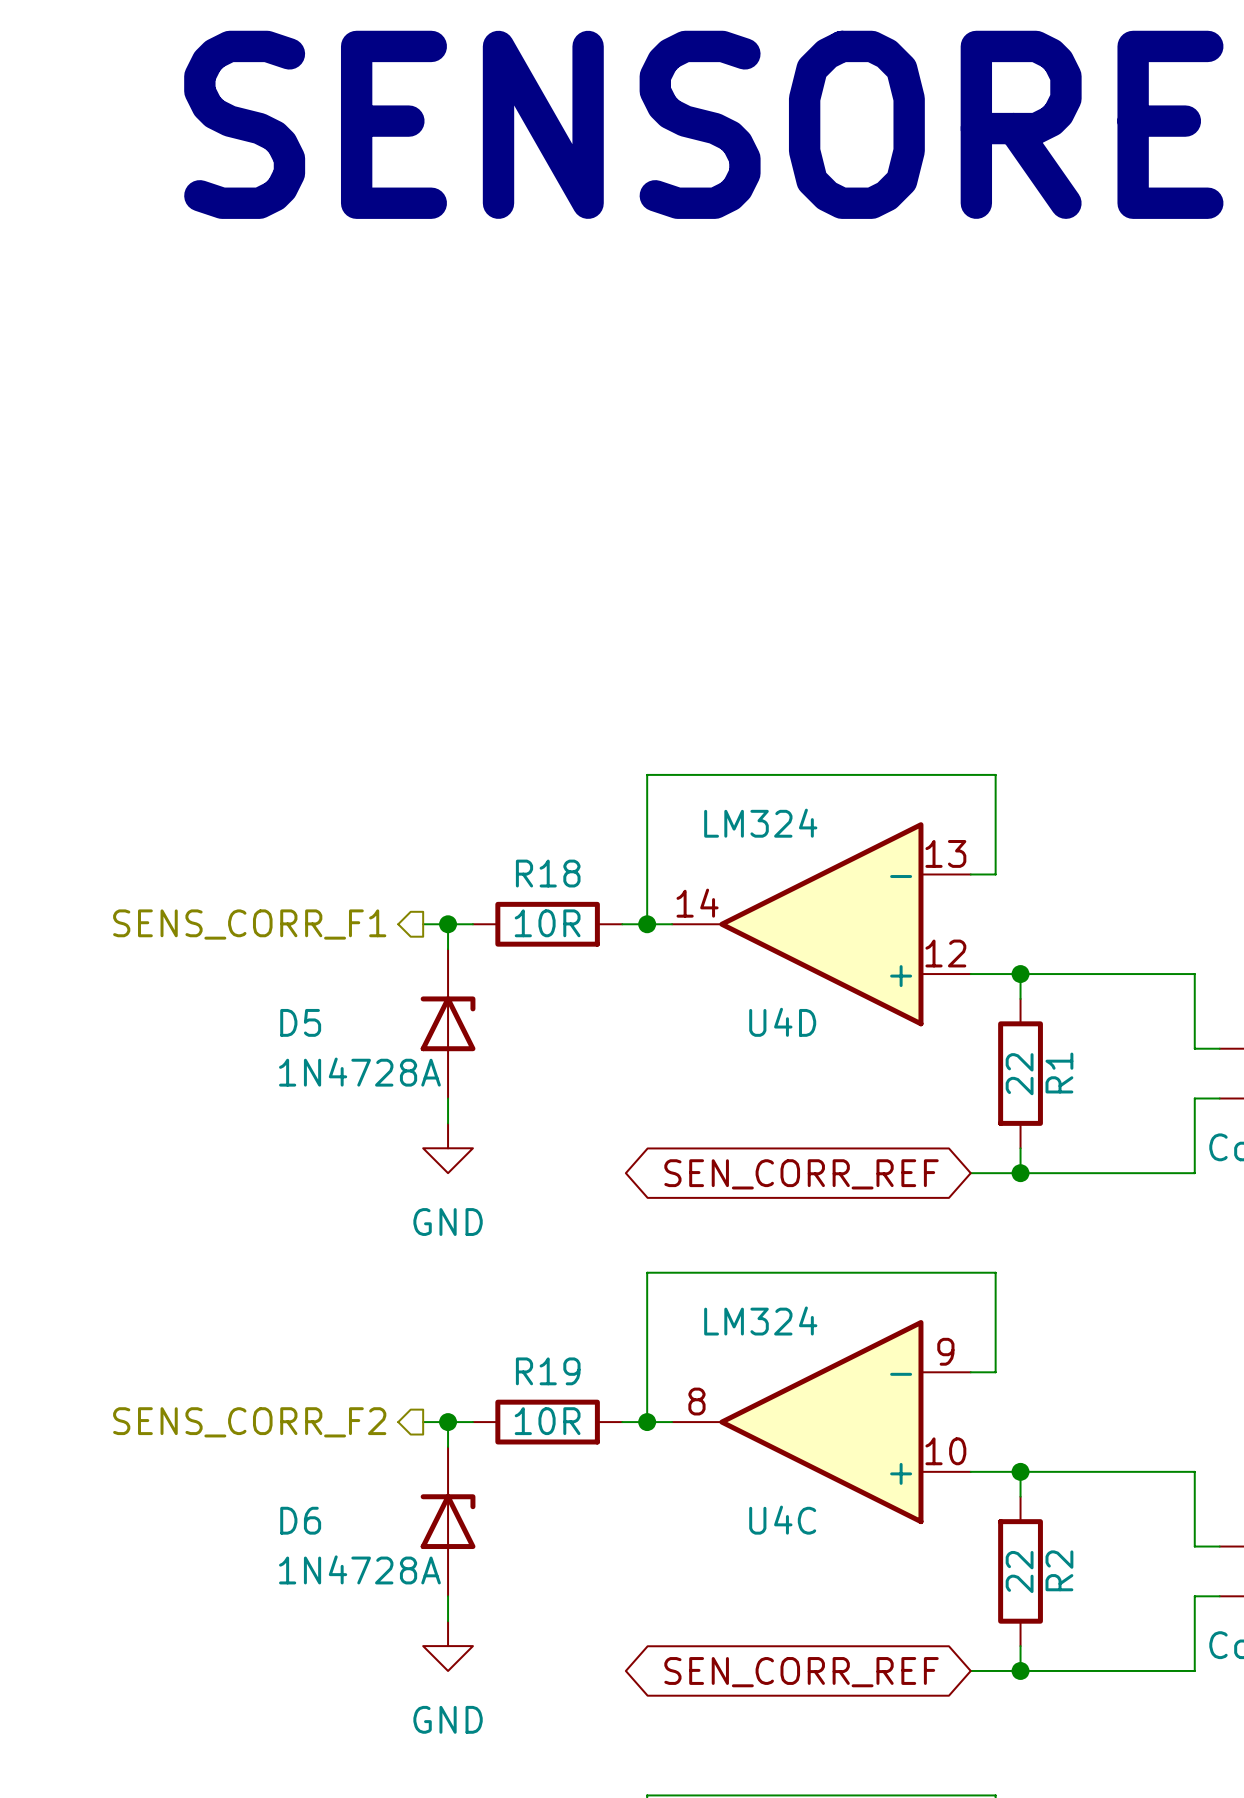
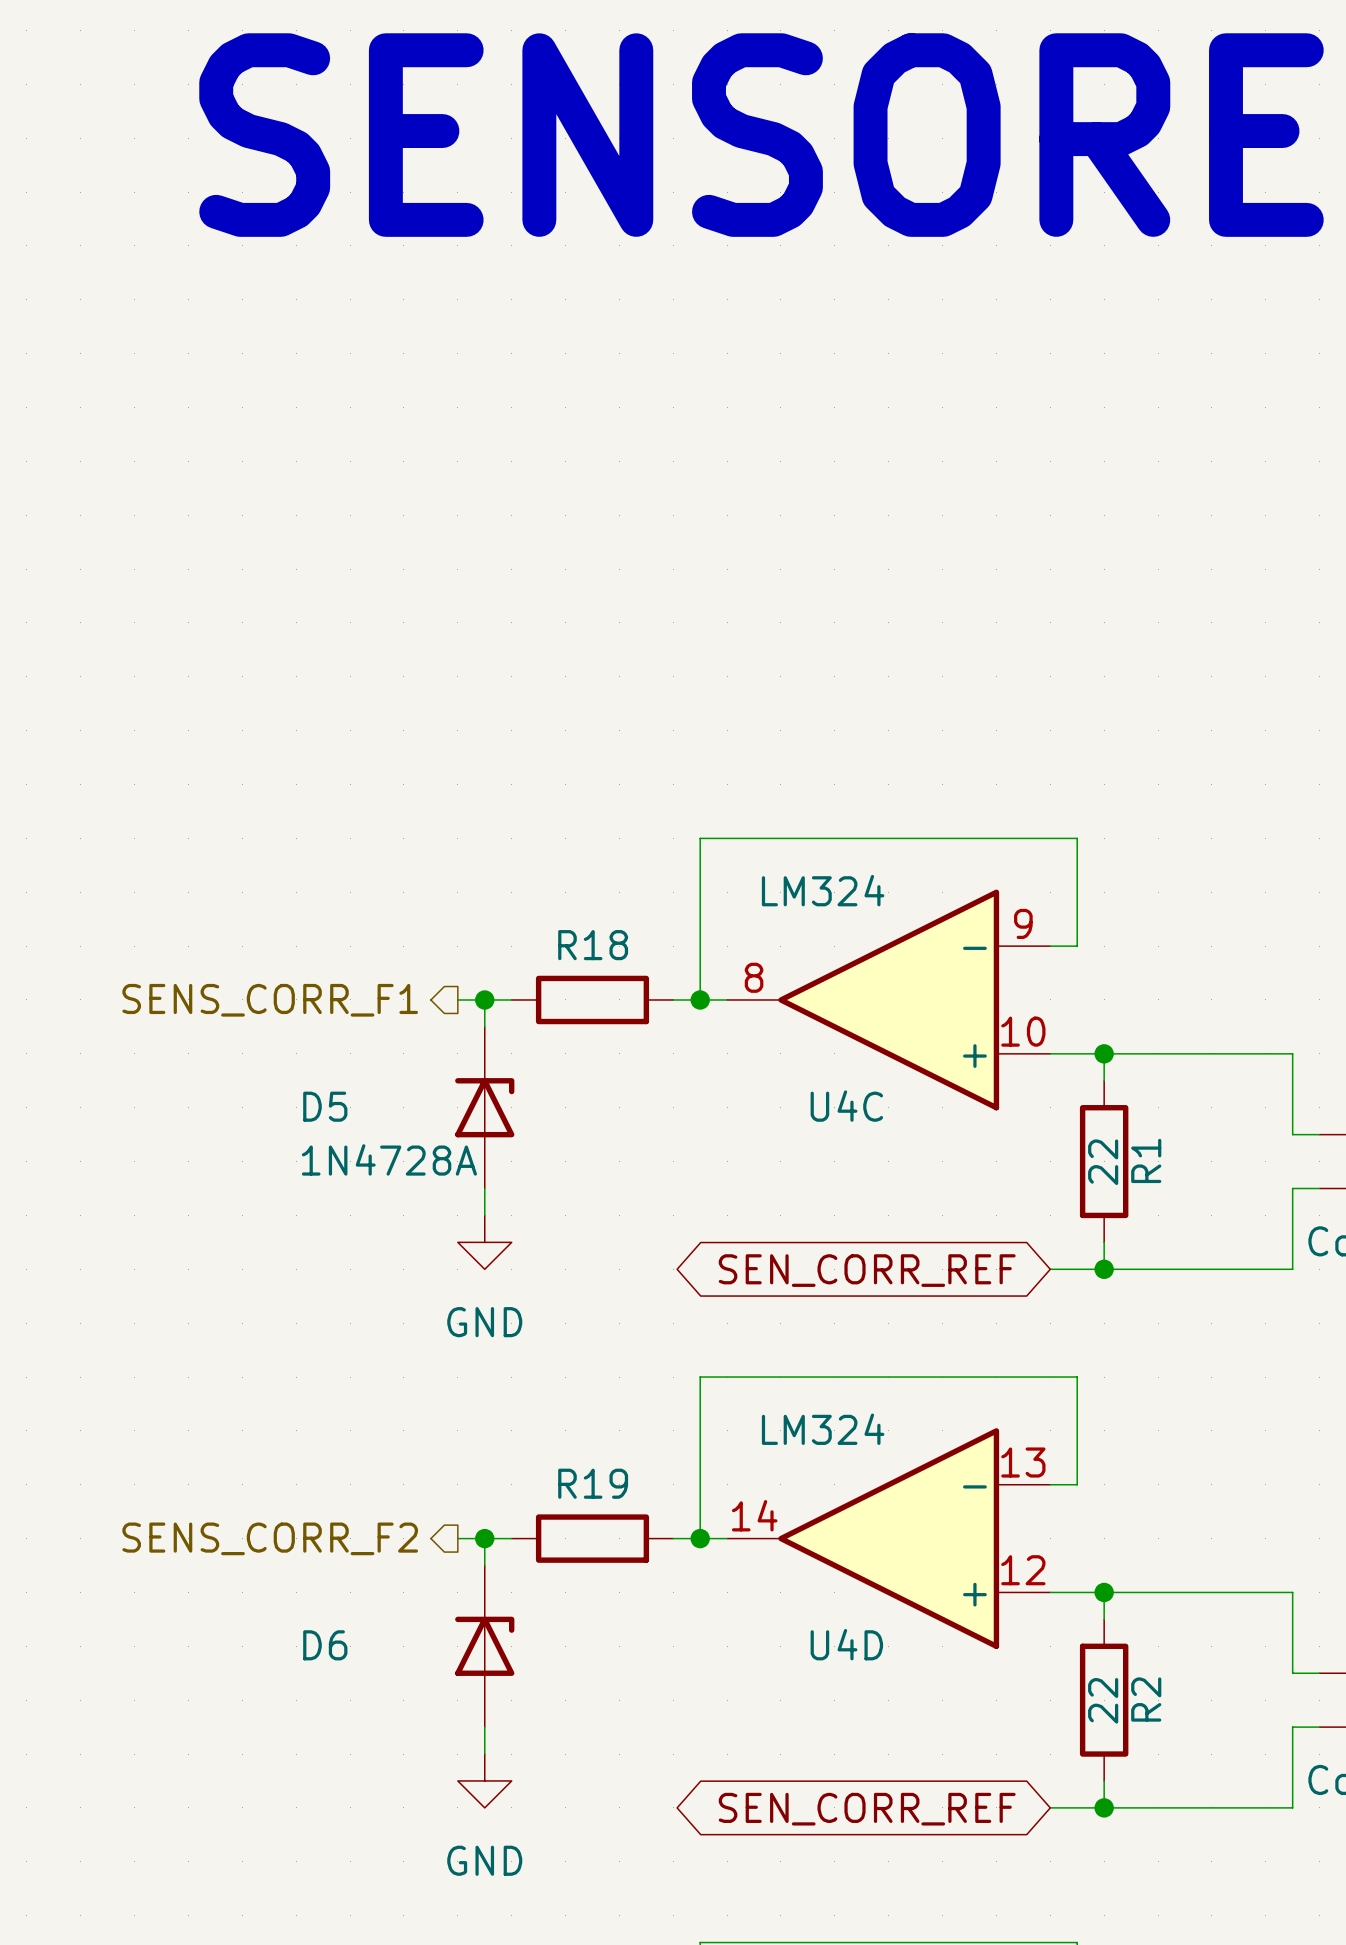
R18 value: 10R (547, 923) -> none
U4D position: (821, 924) -> (888, 1538)
R19 value: 10R (547, 1421) -> none
U4C position: (821, 1422) -> (888, 999)
D6 value: 1N4728A (359, 1569) -> none

